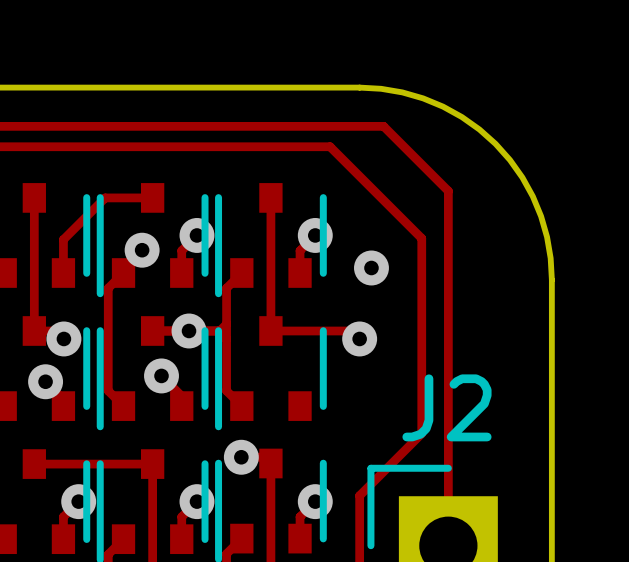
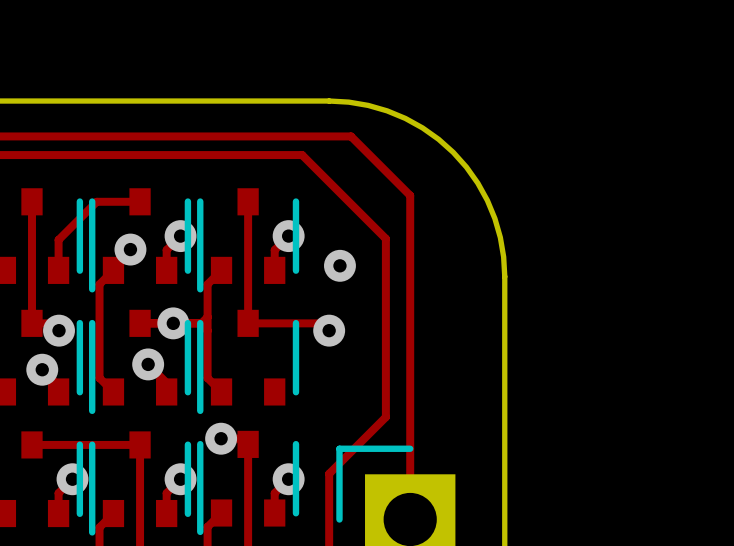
J2 name: J2 (446, 407) -> none

